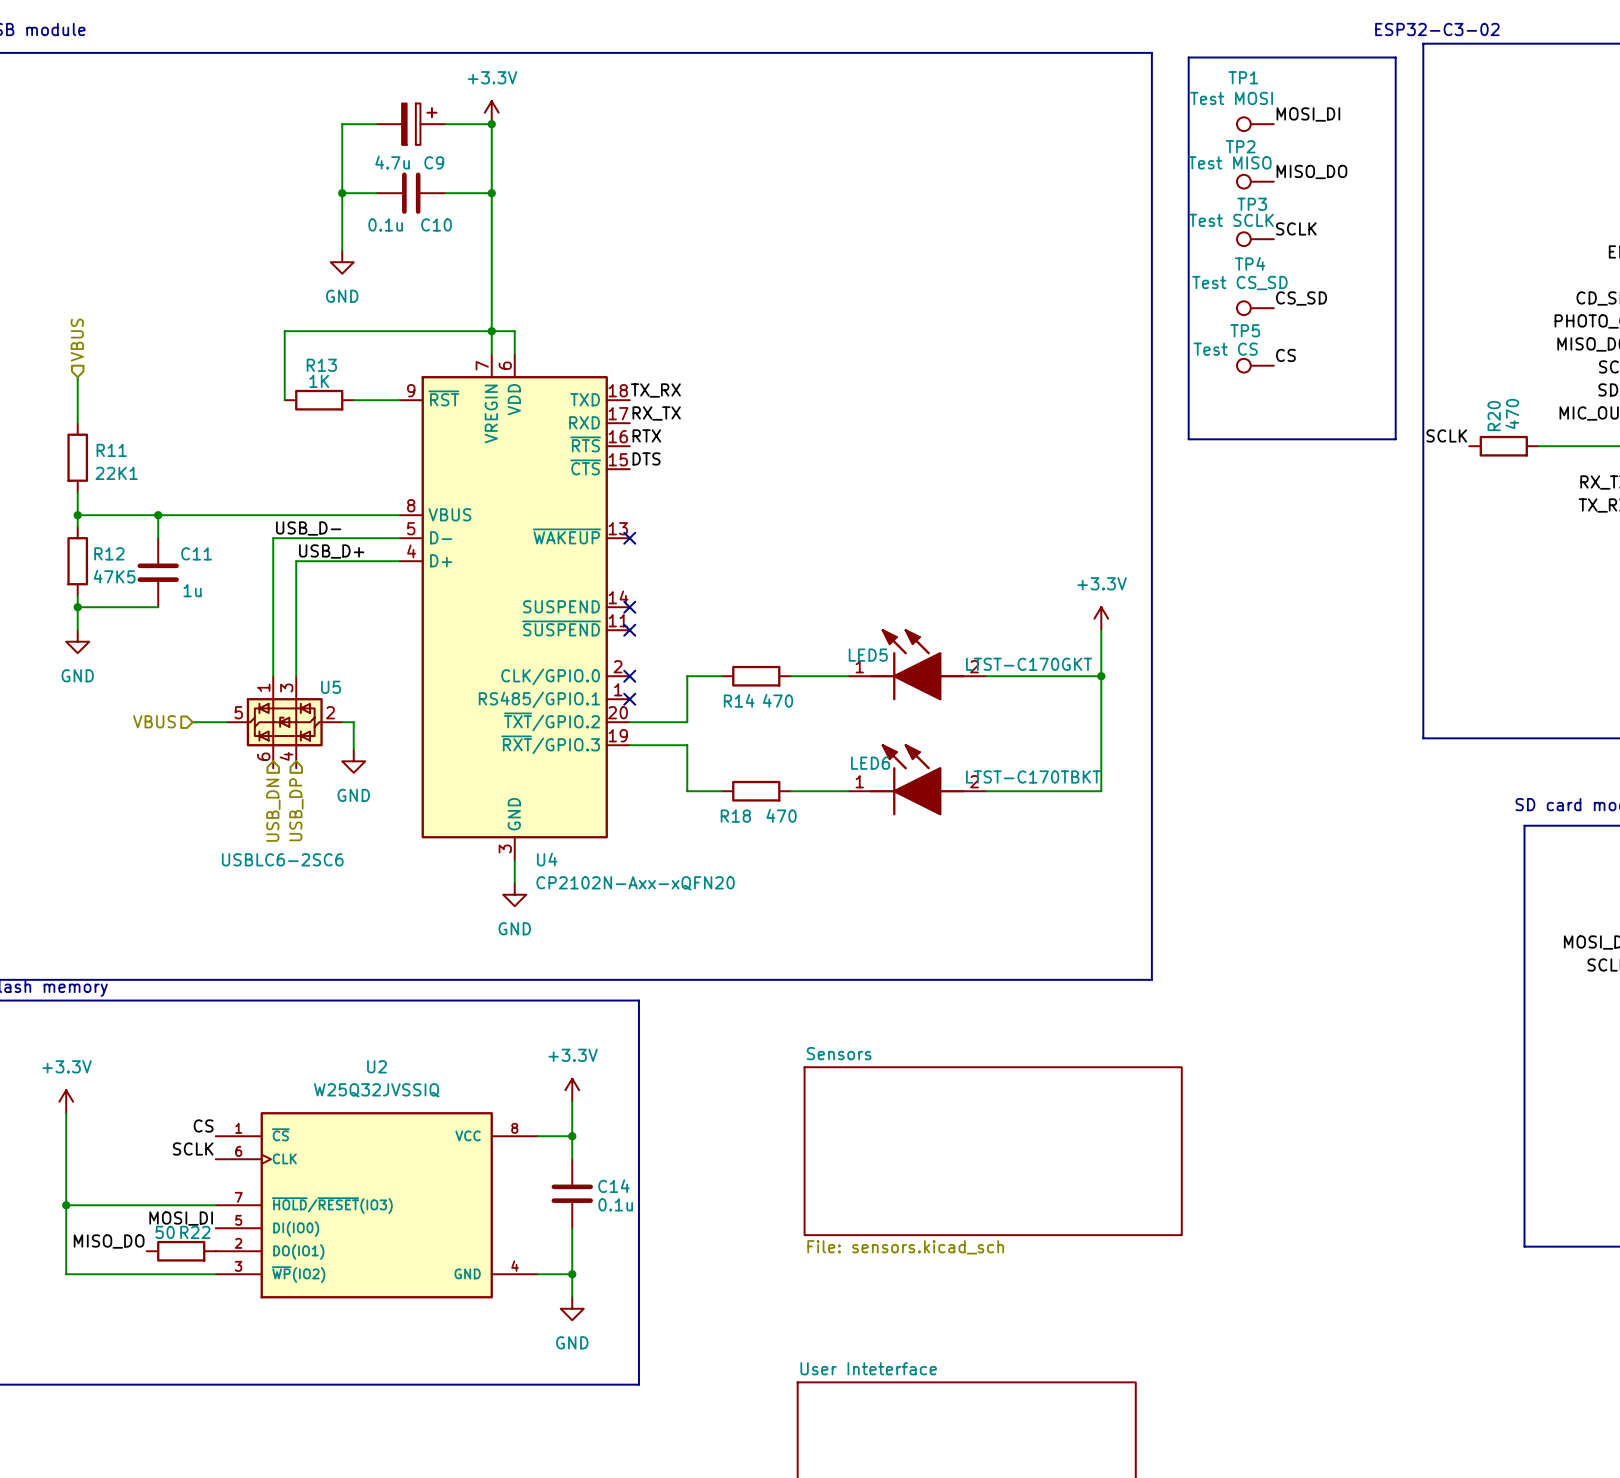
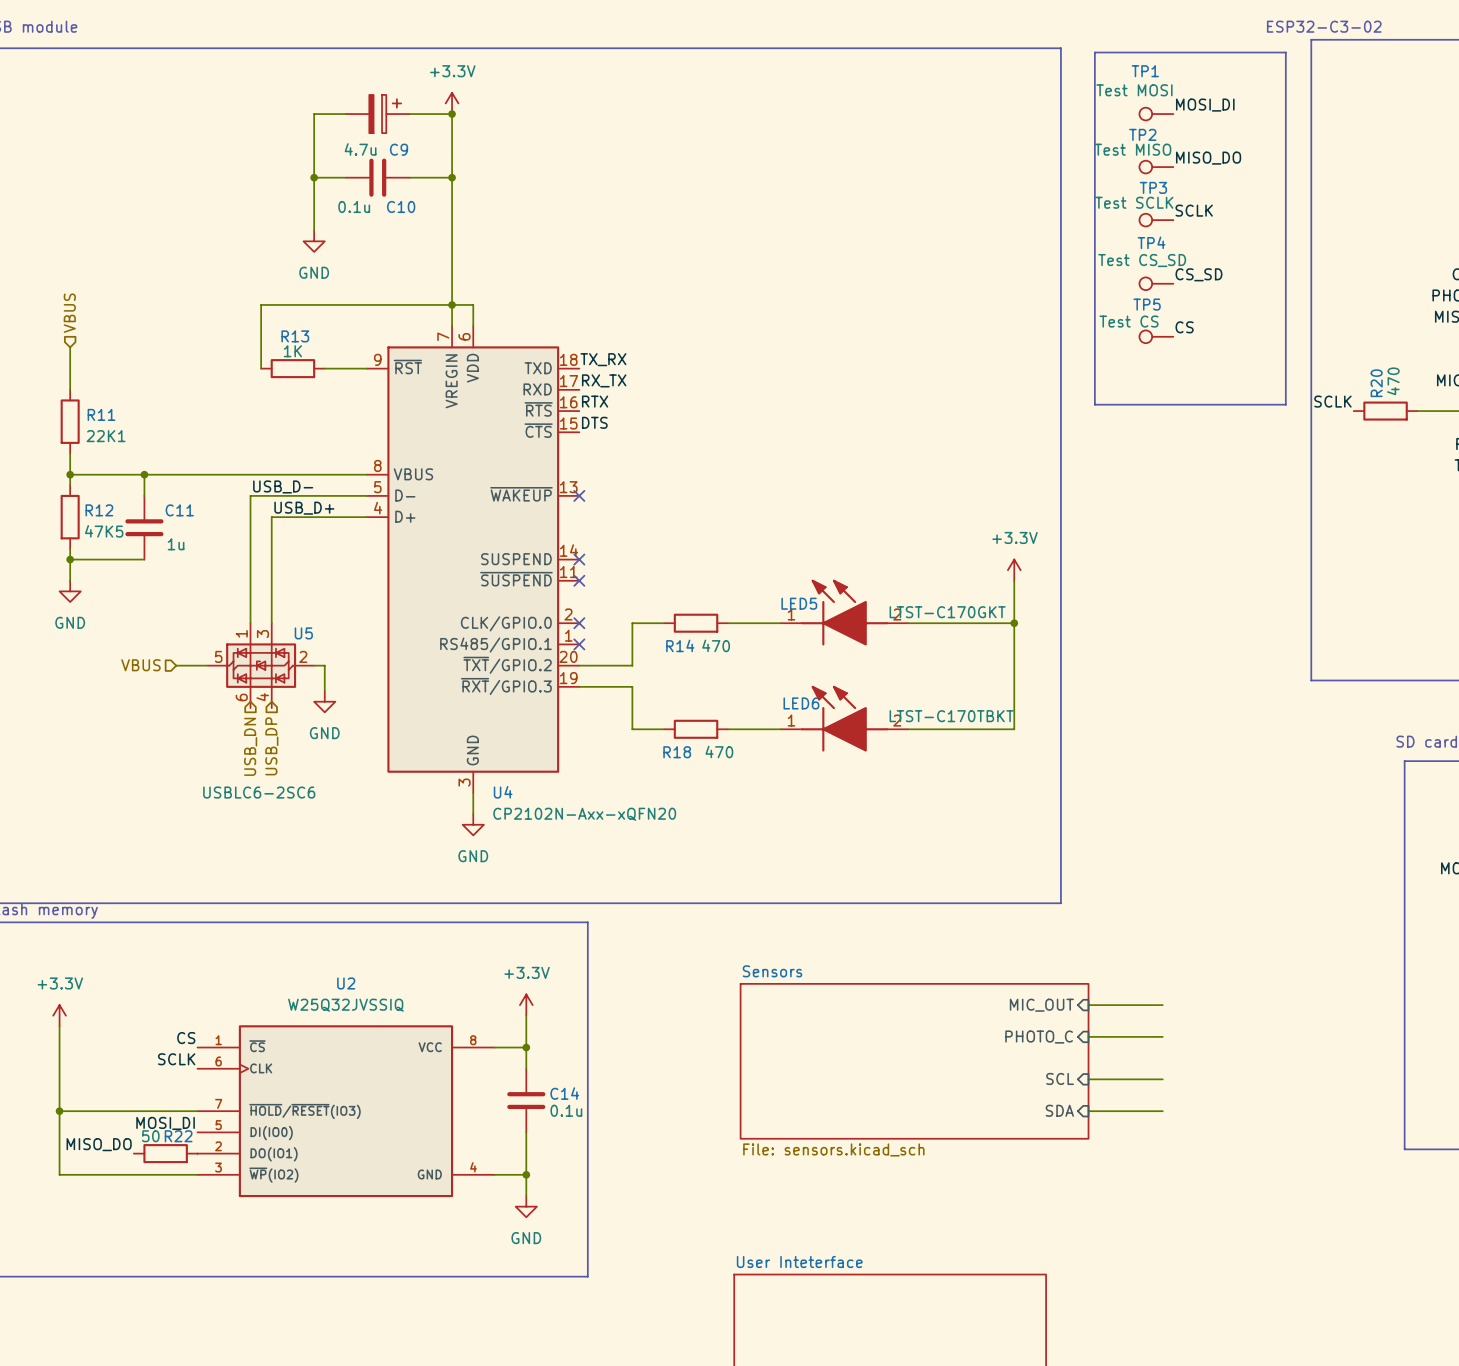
sheet pin: none -> MIC_OUT (1041, 1005)
wire: none -> (1088, 1005) (1162, 1005)
sheet pin: none -> PHOTO_C (1039, 1037)
wire: none -> (1088, 1036) (1162, 1036)
sheet pin: none -> SCL (1060, 1078)
wire: none -> (1088, 1079) (1162, 1079)
sheet pin: none -> SDA (1059, 1110)
wire: none -> (1088, 1111) (1162, 1111)

